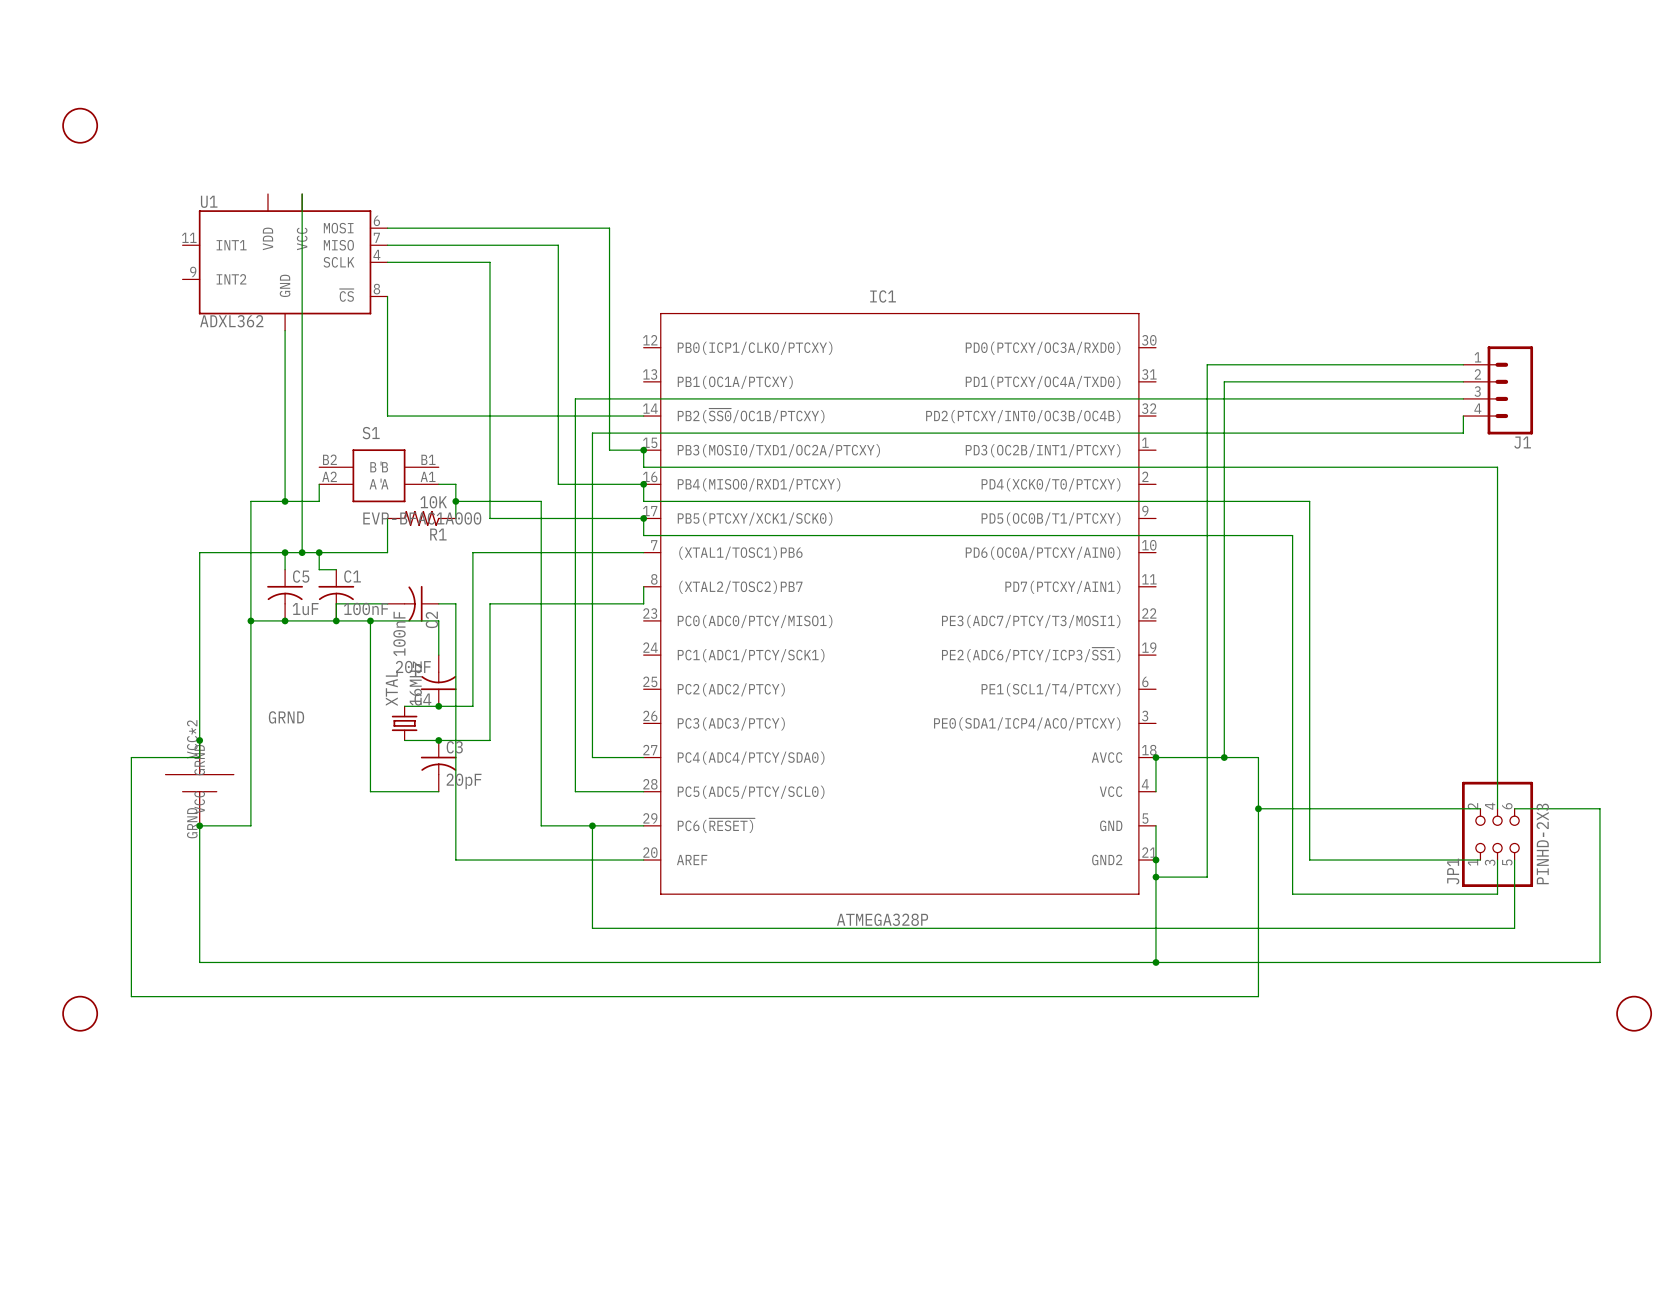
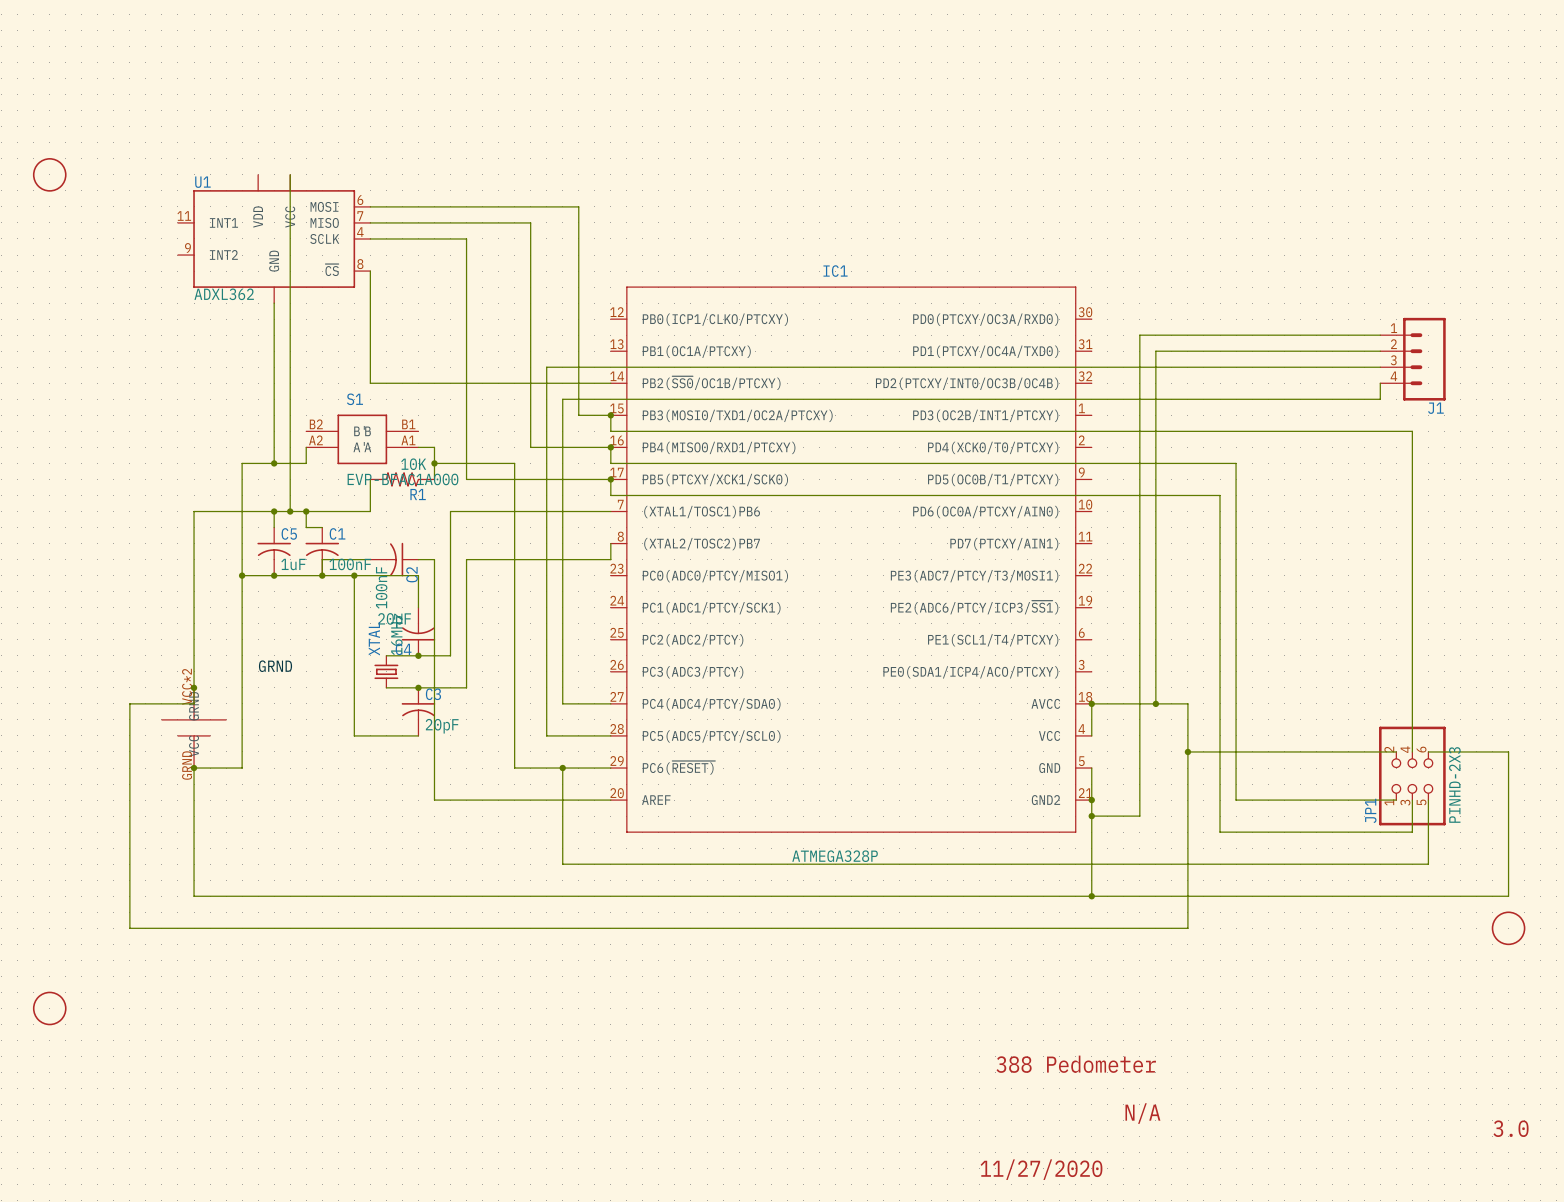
part position: (80, 125) -> (49, 174)
part position: (80, 1013) -> (49, 1008)
part position: (1634, 1013) -> (1508, 928)
text: none -> 388 Pedometer (1076, 1064)
text: none -> N/A (1142, 1113)
text: none -> 3.0 (1511, 1128)
text: none -> 11/27/2020 (1041, 1169)

